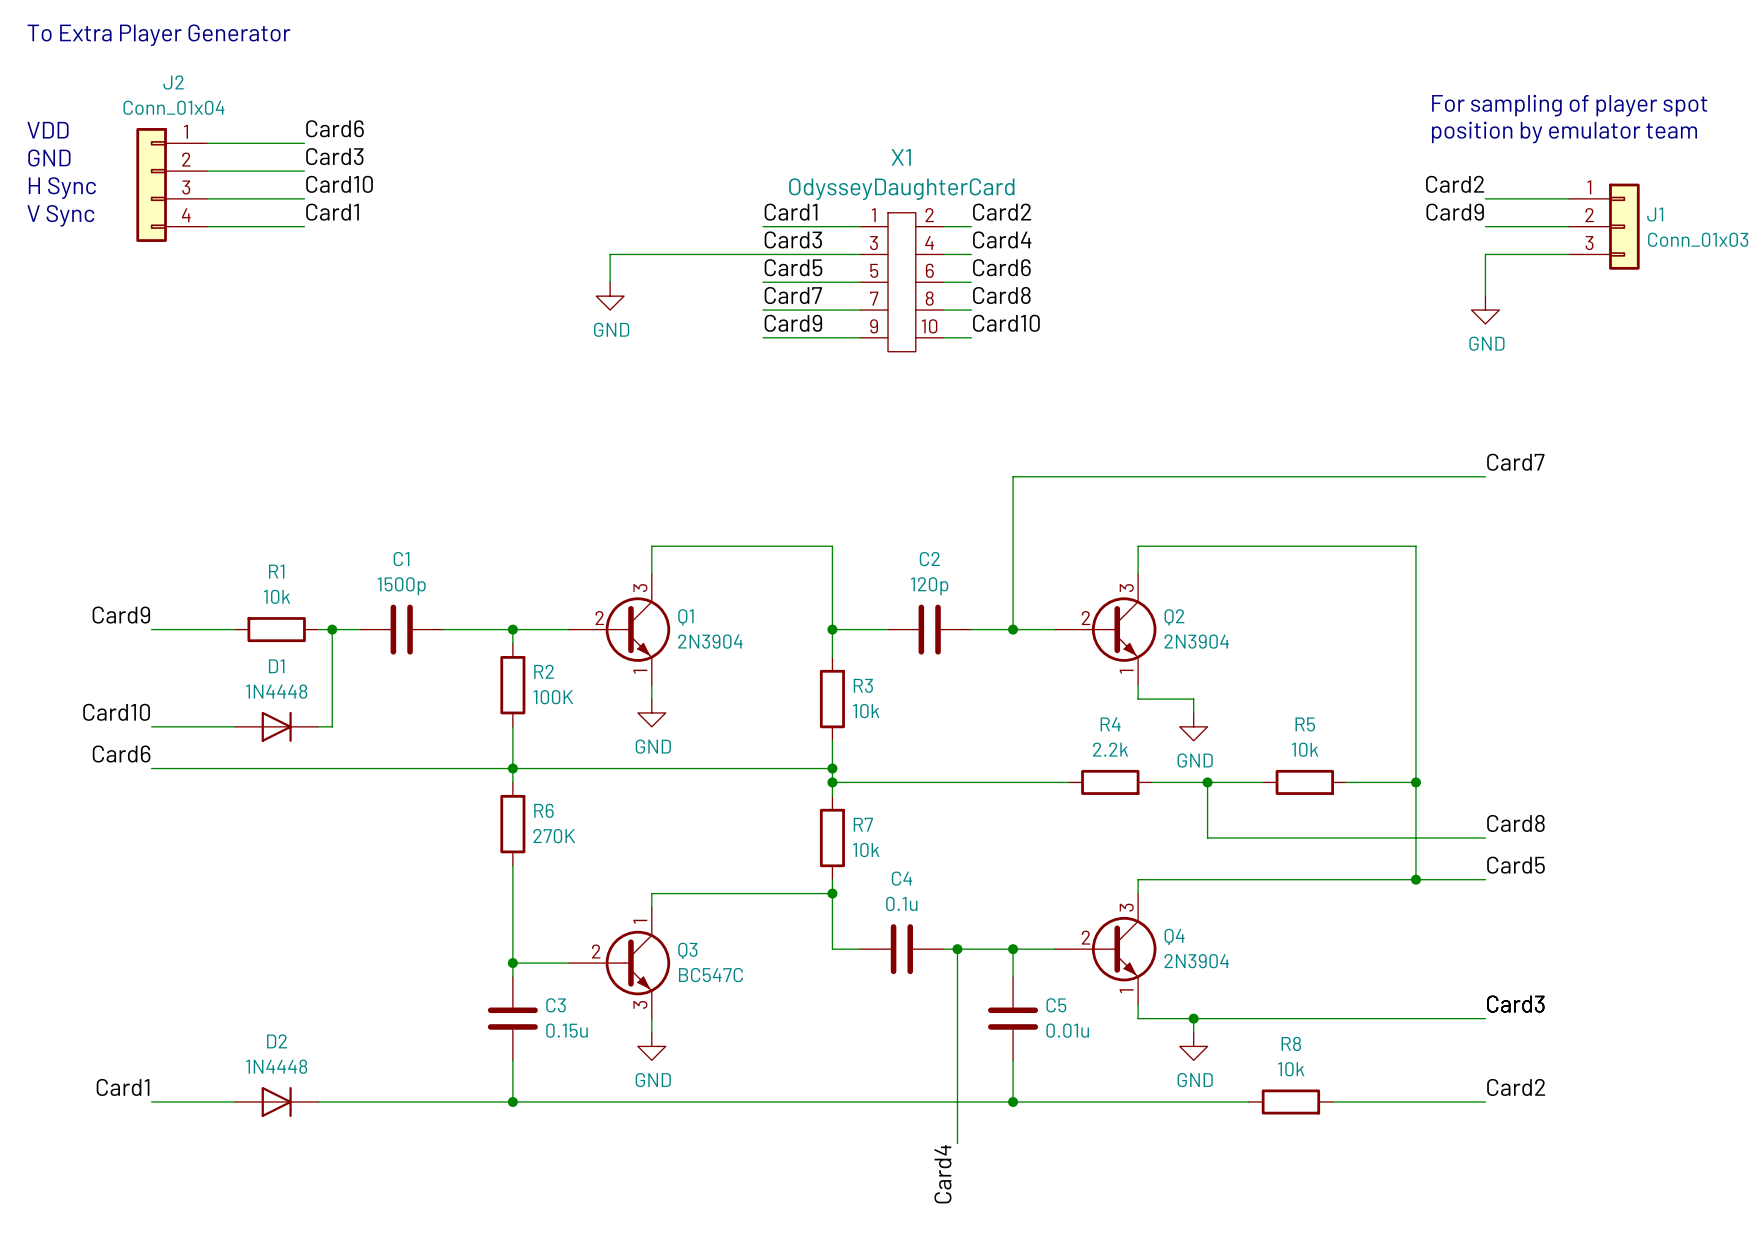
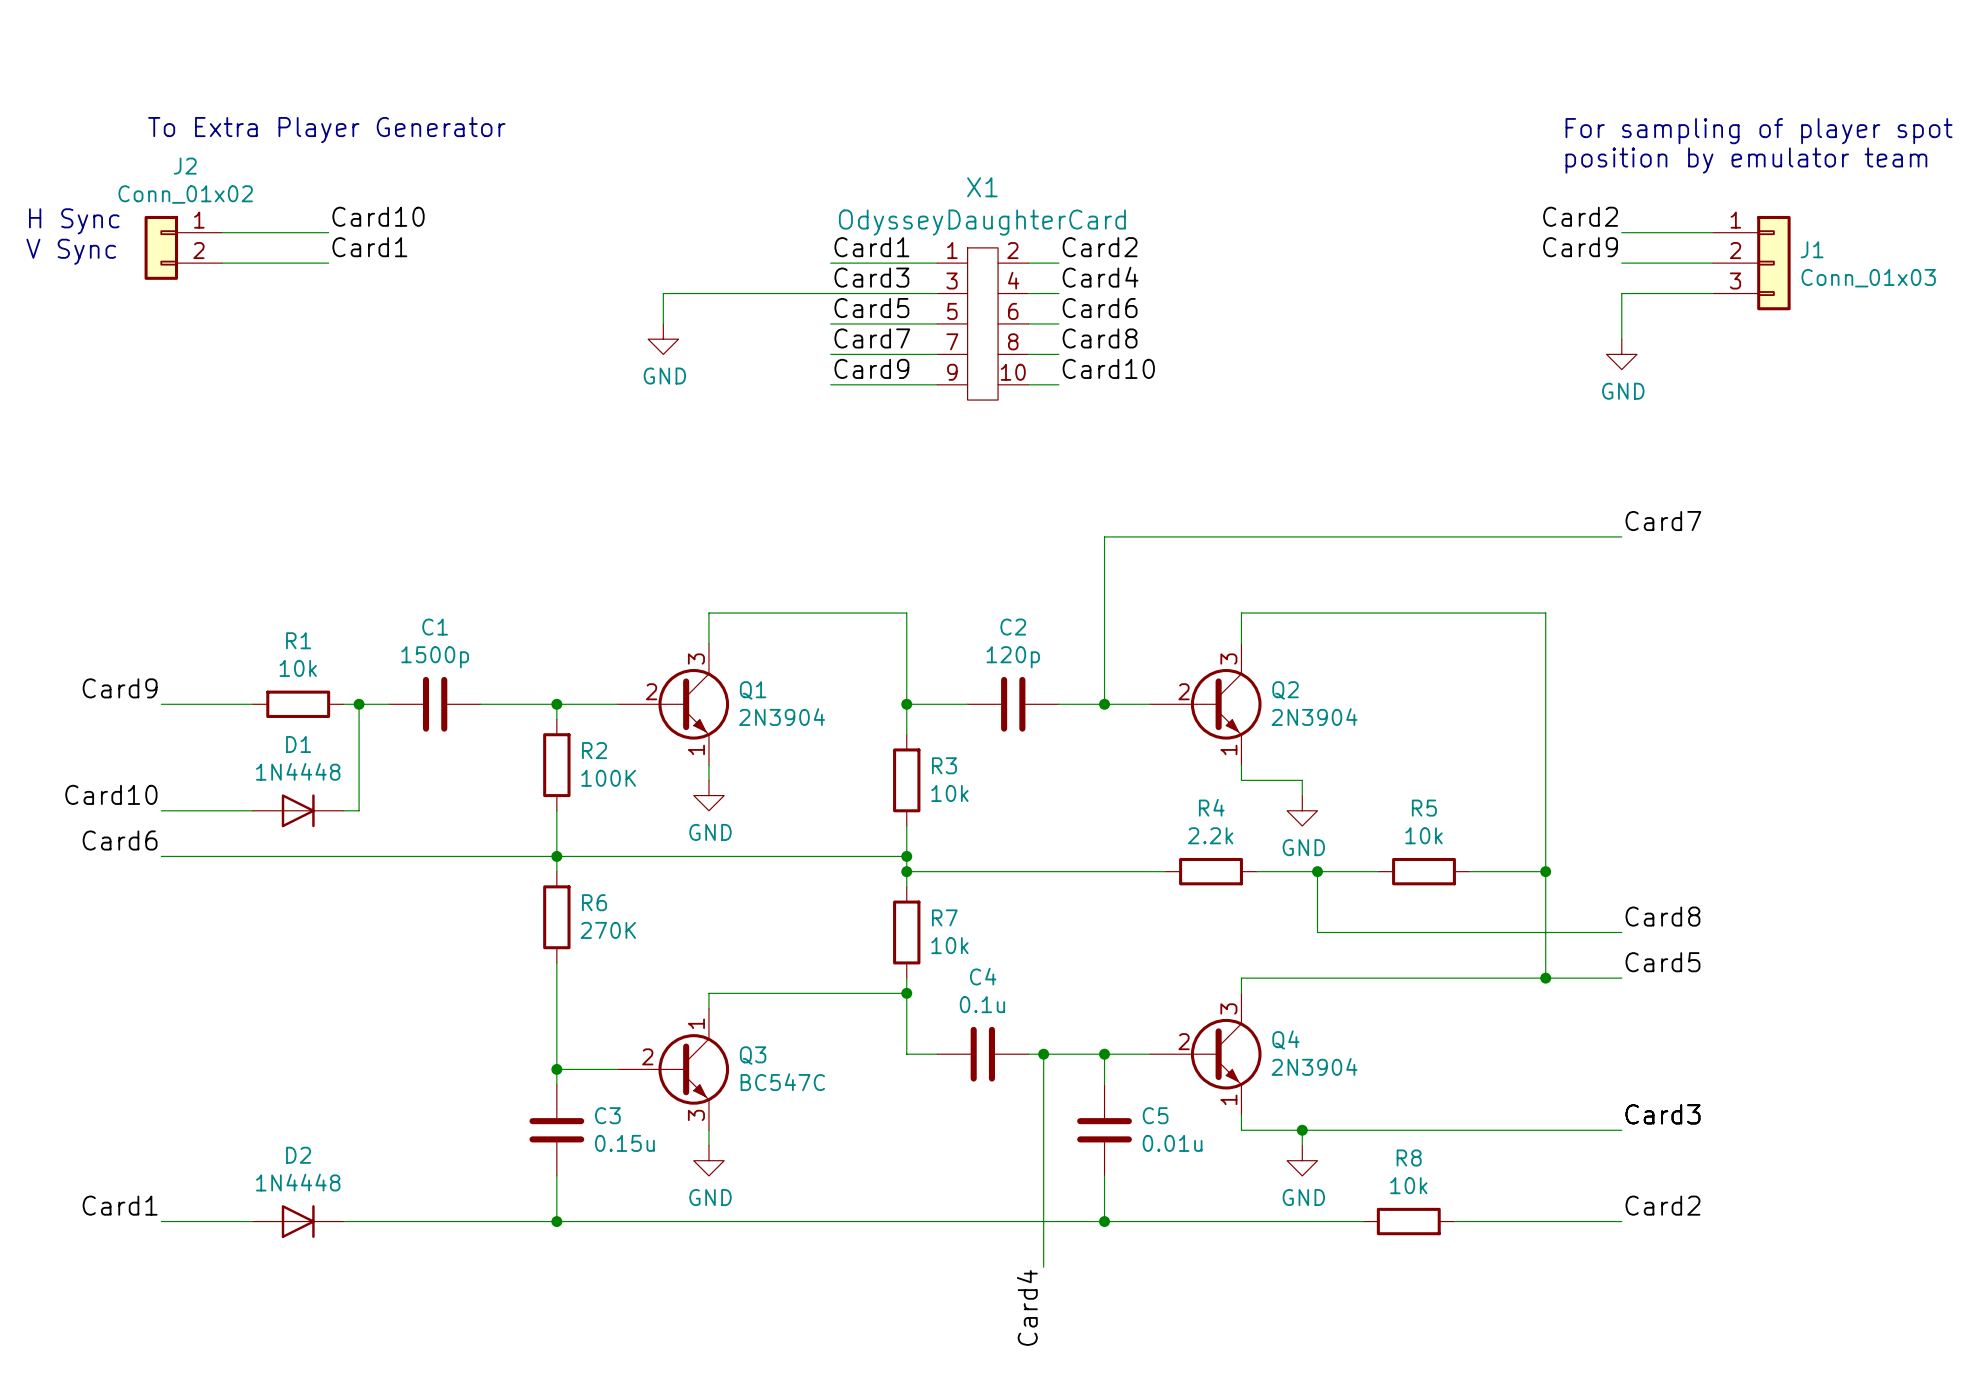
text position: To Extra Player Generator (159, 35) -> To Extra Player Generator (326, 130)
J2 name position: J2 (173, 82) -> J2 (185, 166)
J2 value: Conn_01x04 (173, 107) -> Conn_01x02 (185, 194)
J2 symbol: [136, 128, 208, 242] -> [144, 215, 223, 280]
label: Card6 (335, 128) -> none
text: VDD (47, 130) -> none
wire: (207, 143) (304, 143) -> none
label: Card3 (334, 156) -> none
text: GND (49, 157) -> none
wire: (207, 171) (304, 171) -> none

